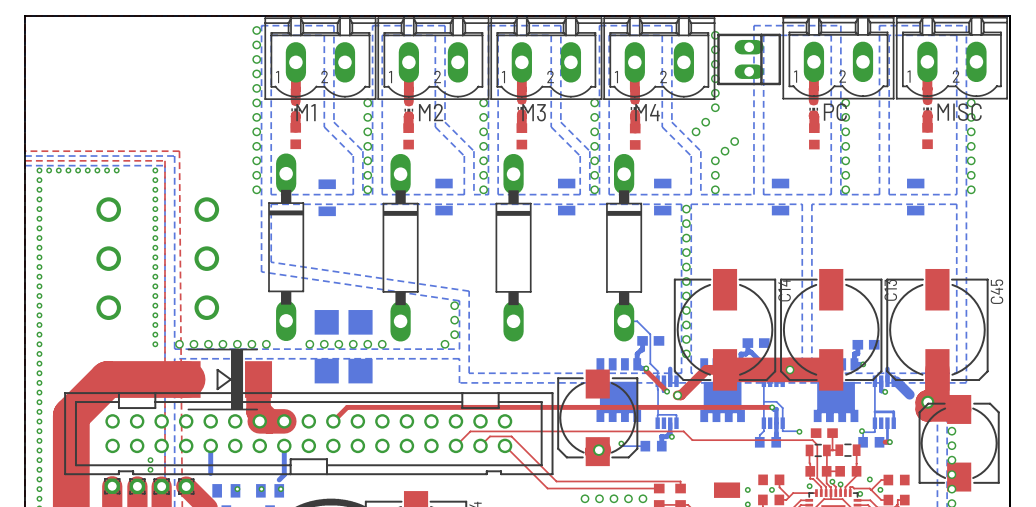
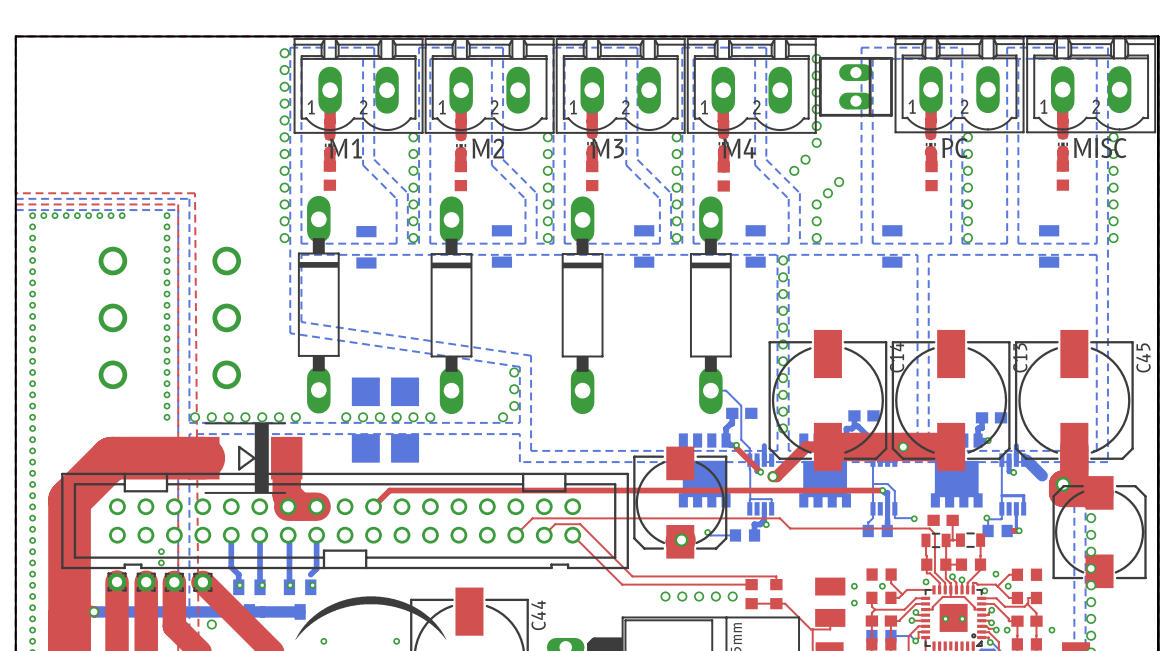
bottom track: none -> (260, 535) (260, 587)
bottom track: none -> (289, 536) (289, 587)
bottom track: none -> (231, 567) (238, 574) (238, 586)
via: none -> (239, 585)

